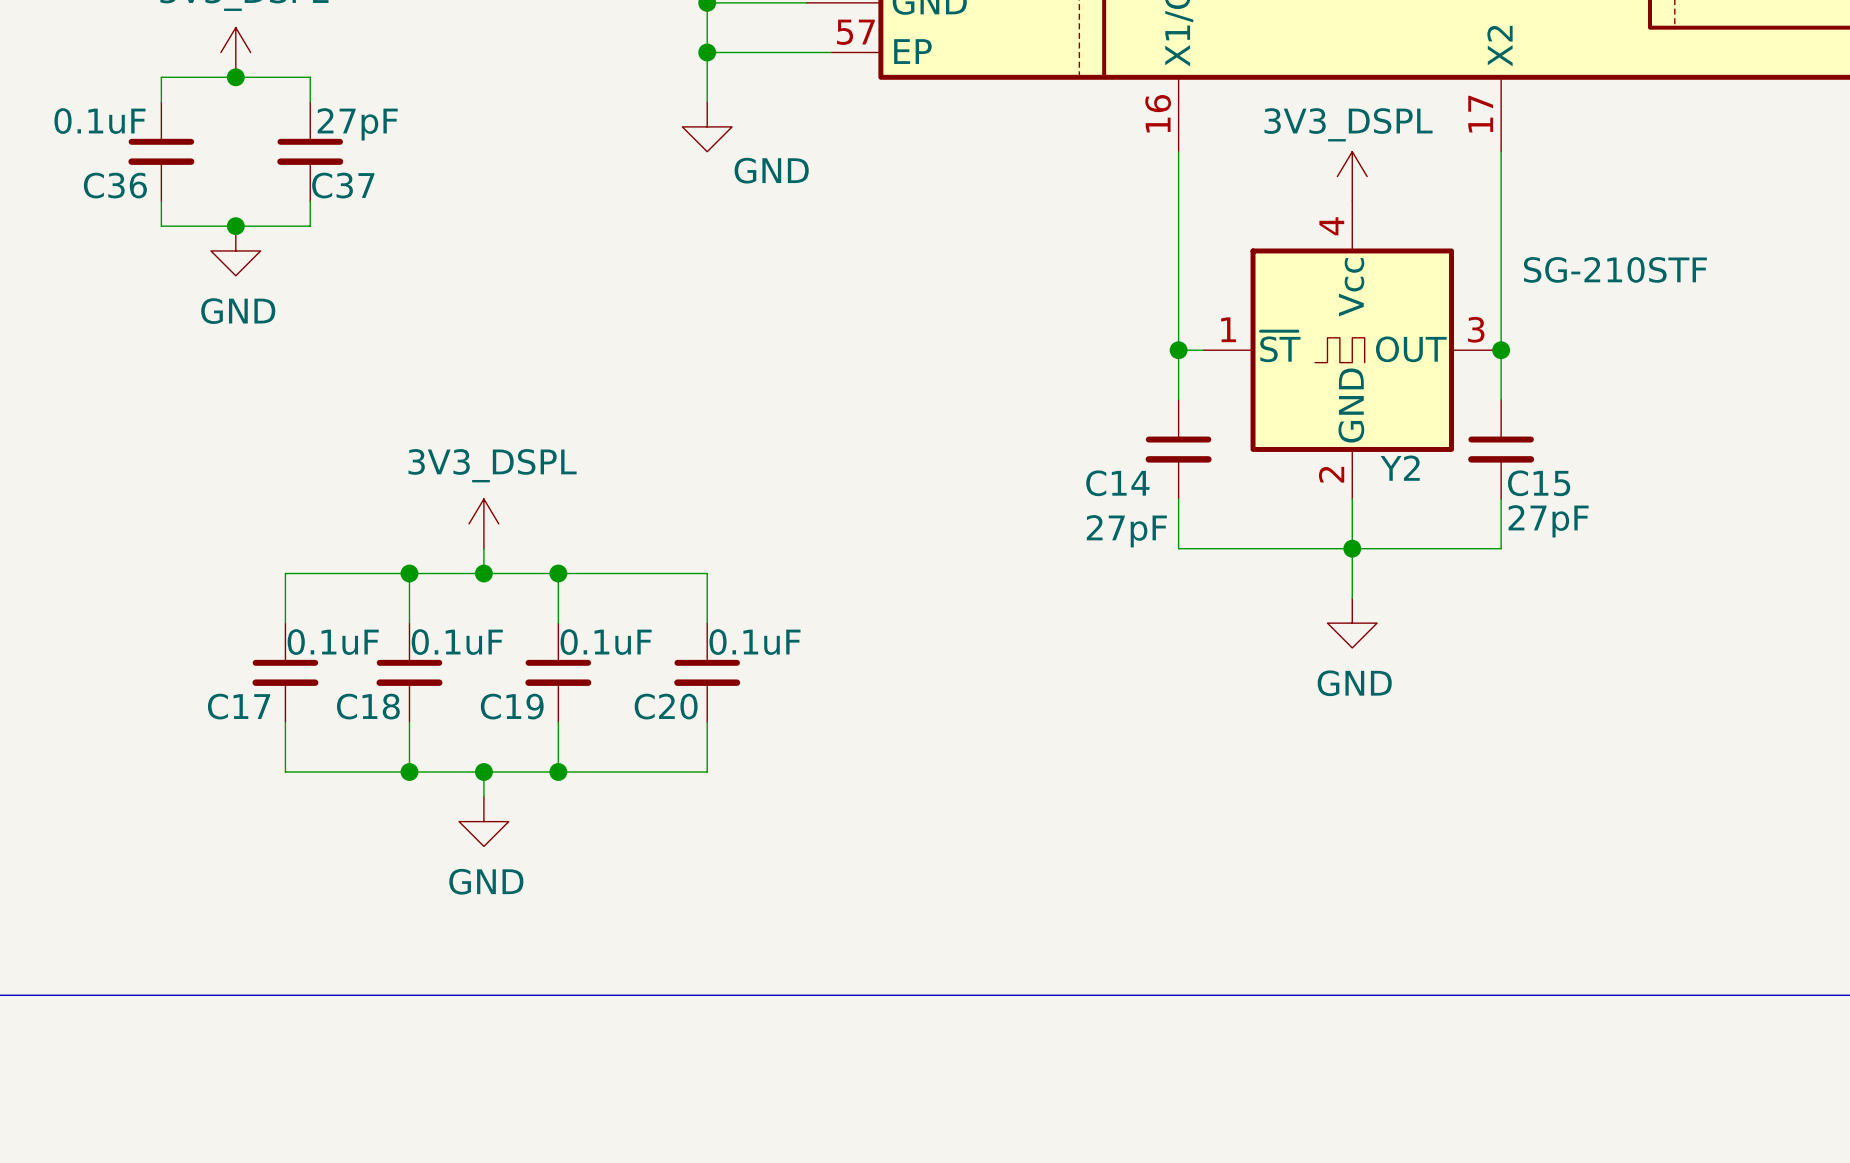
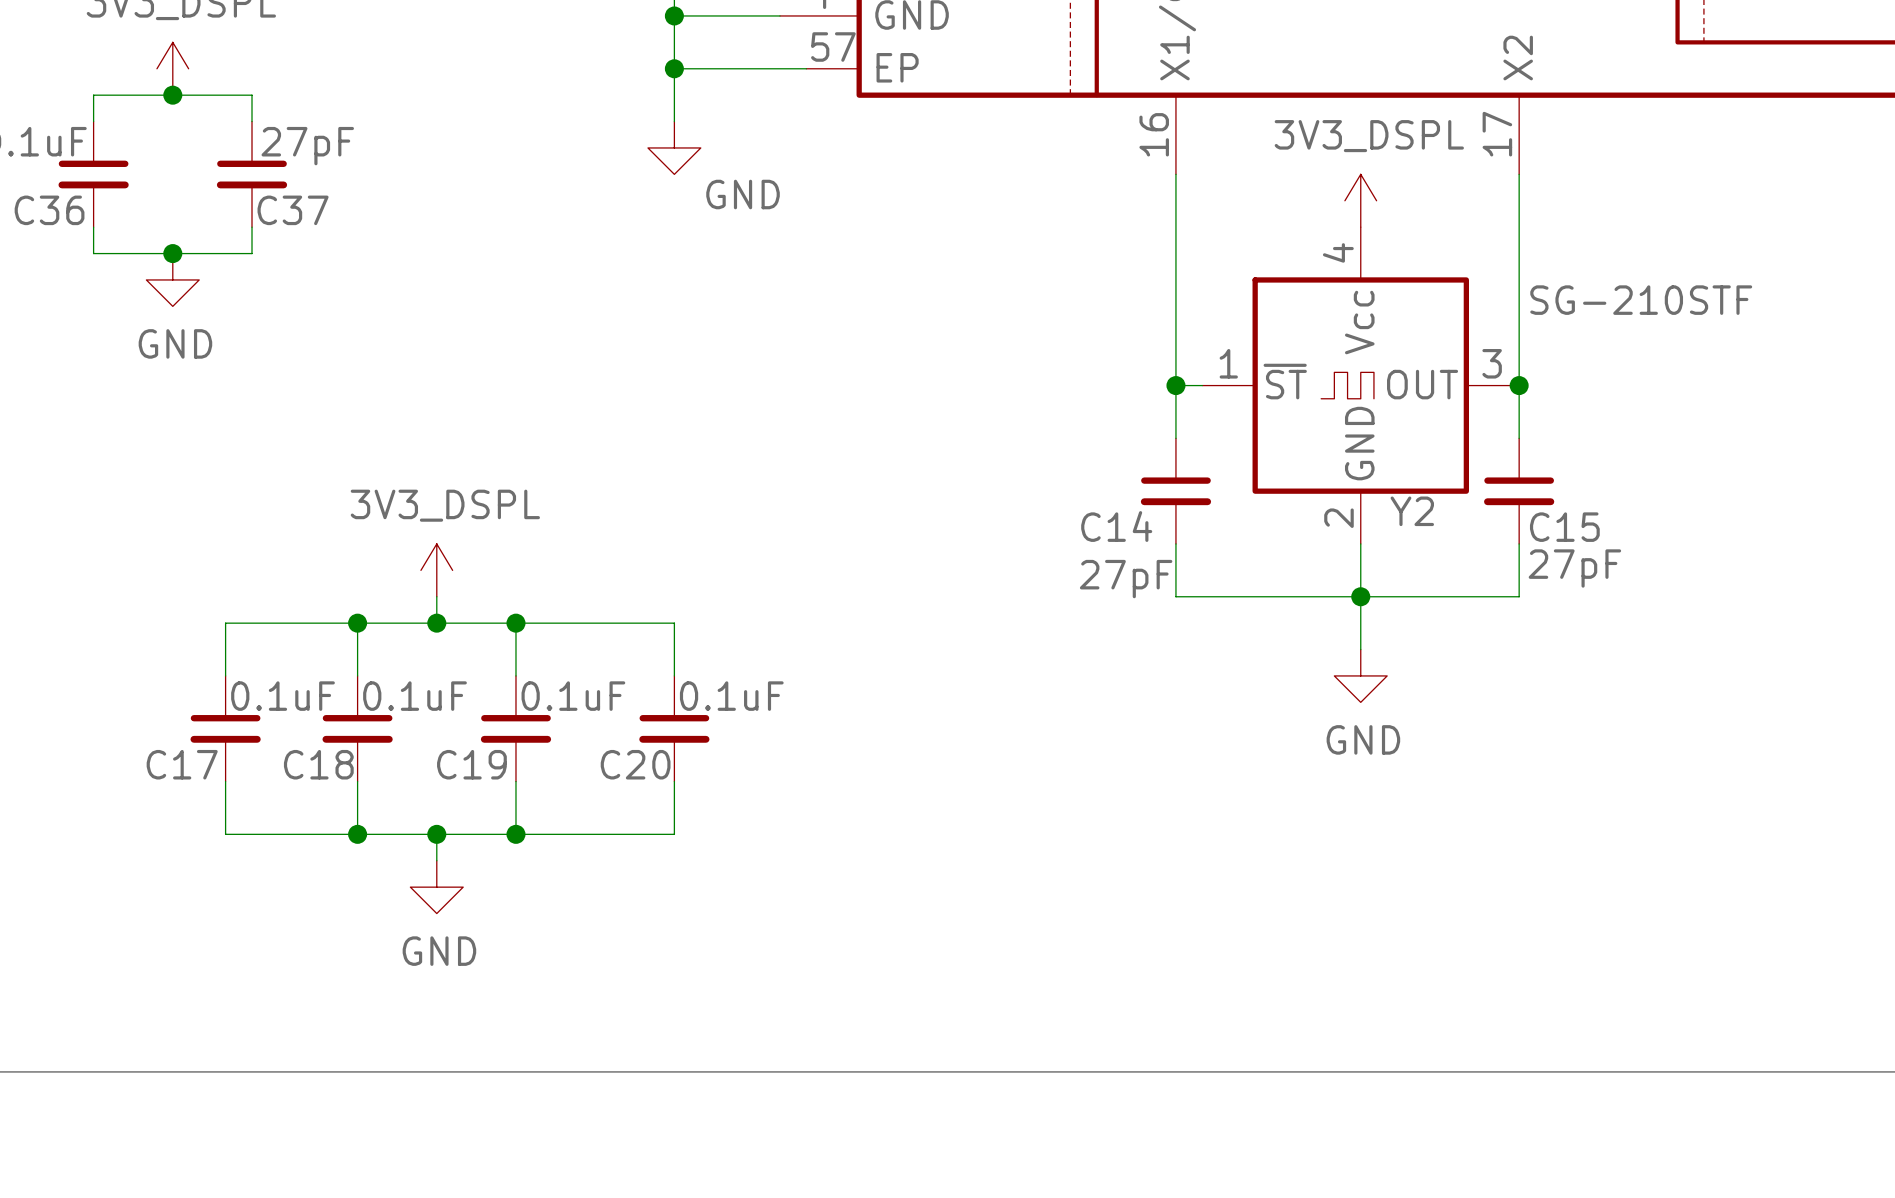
power symbol text position: 3V3_DSPL (1348, 124) -> 3V3_DSPL (1369, 136)

